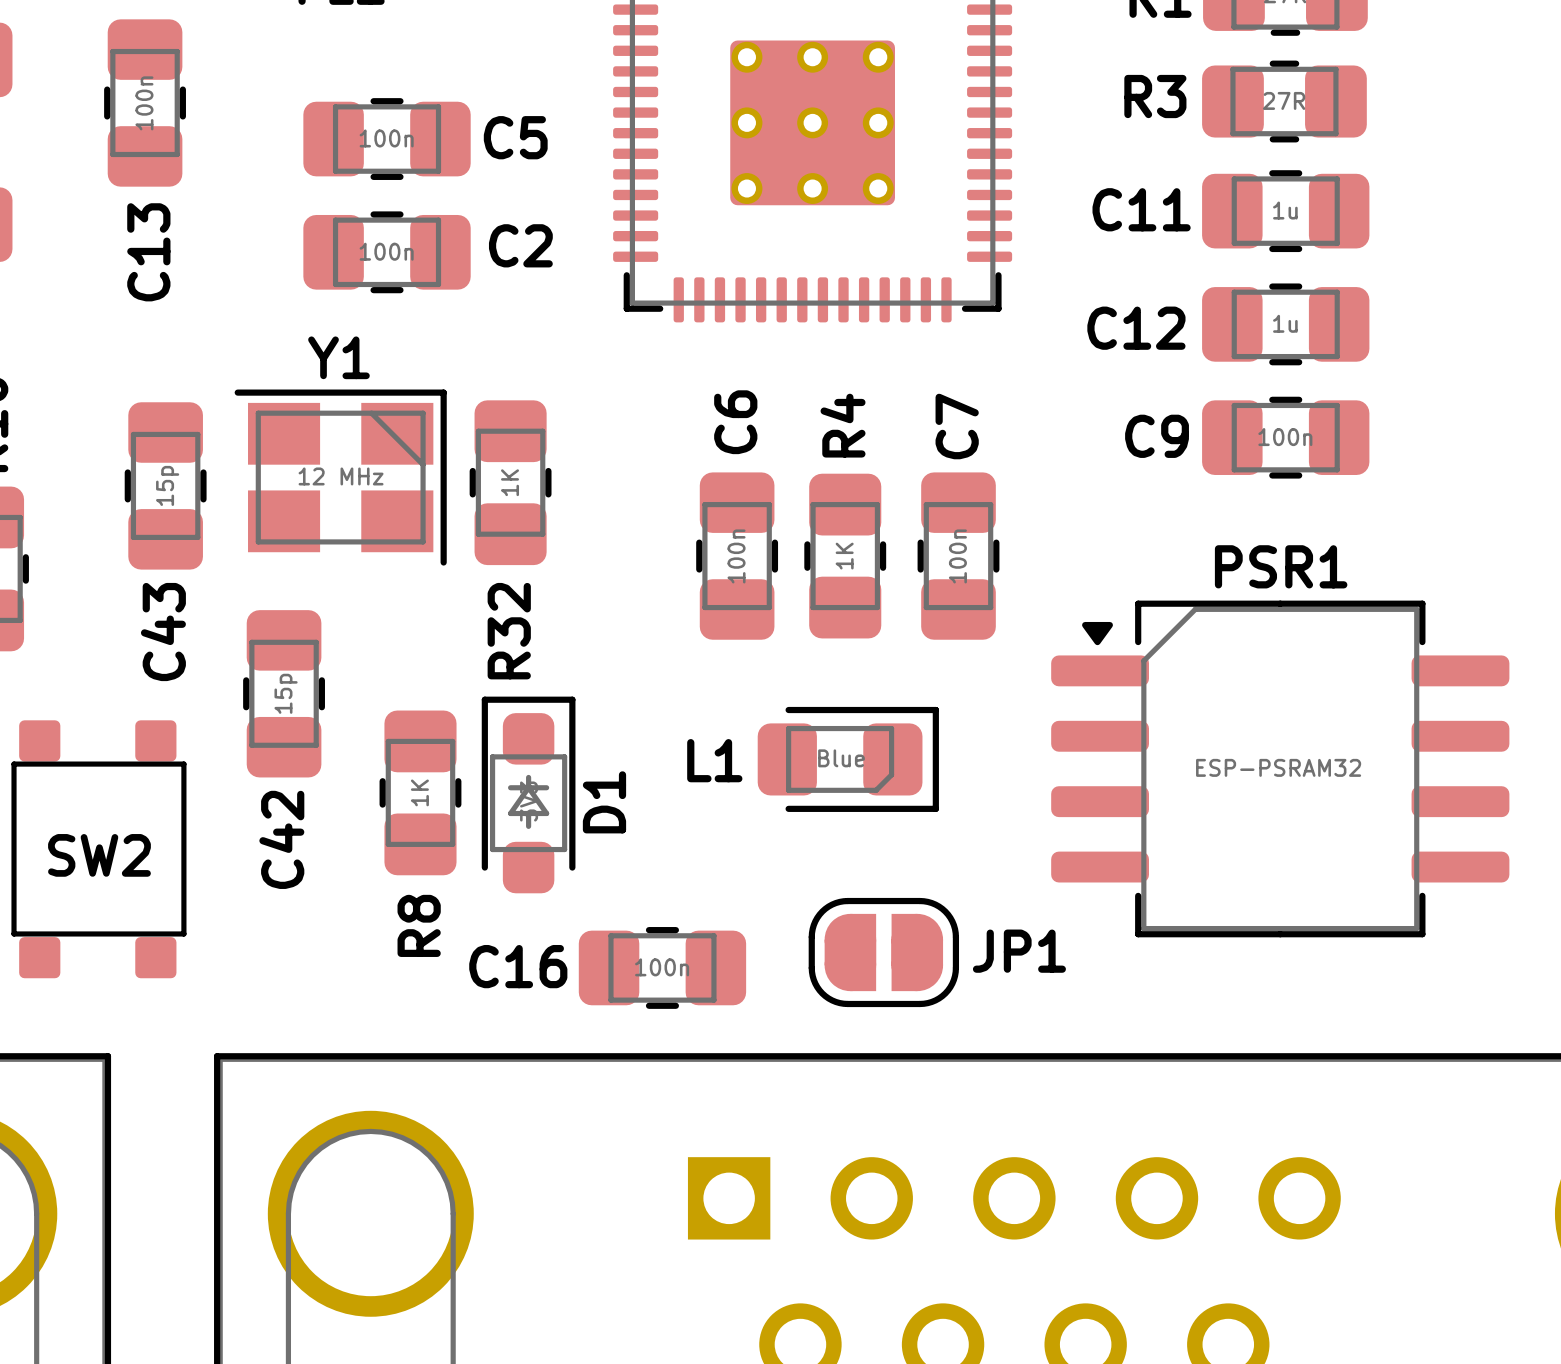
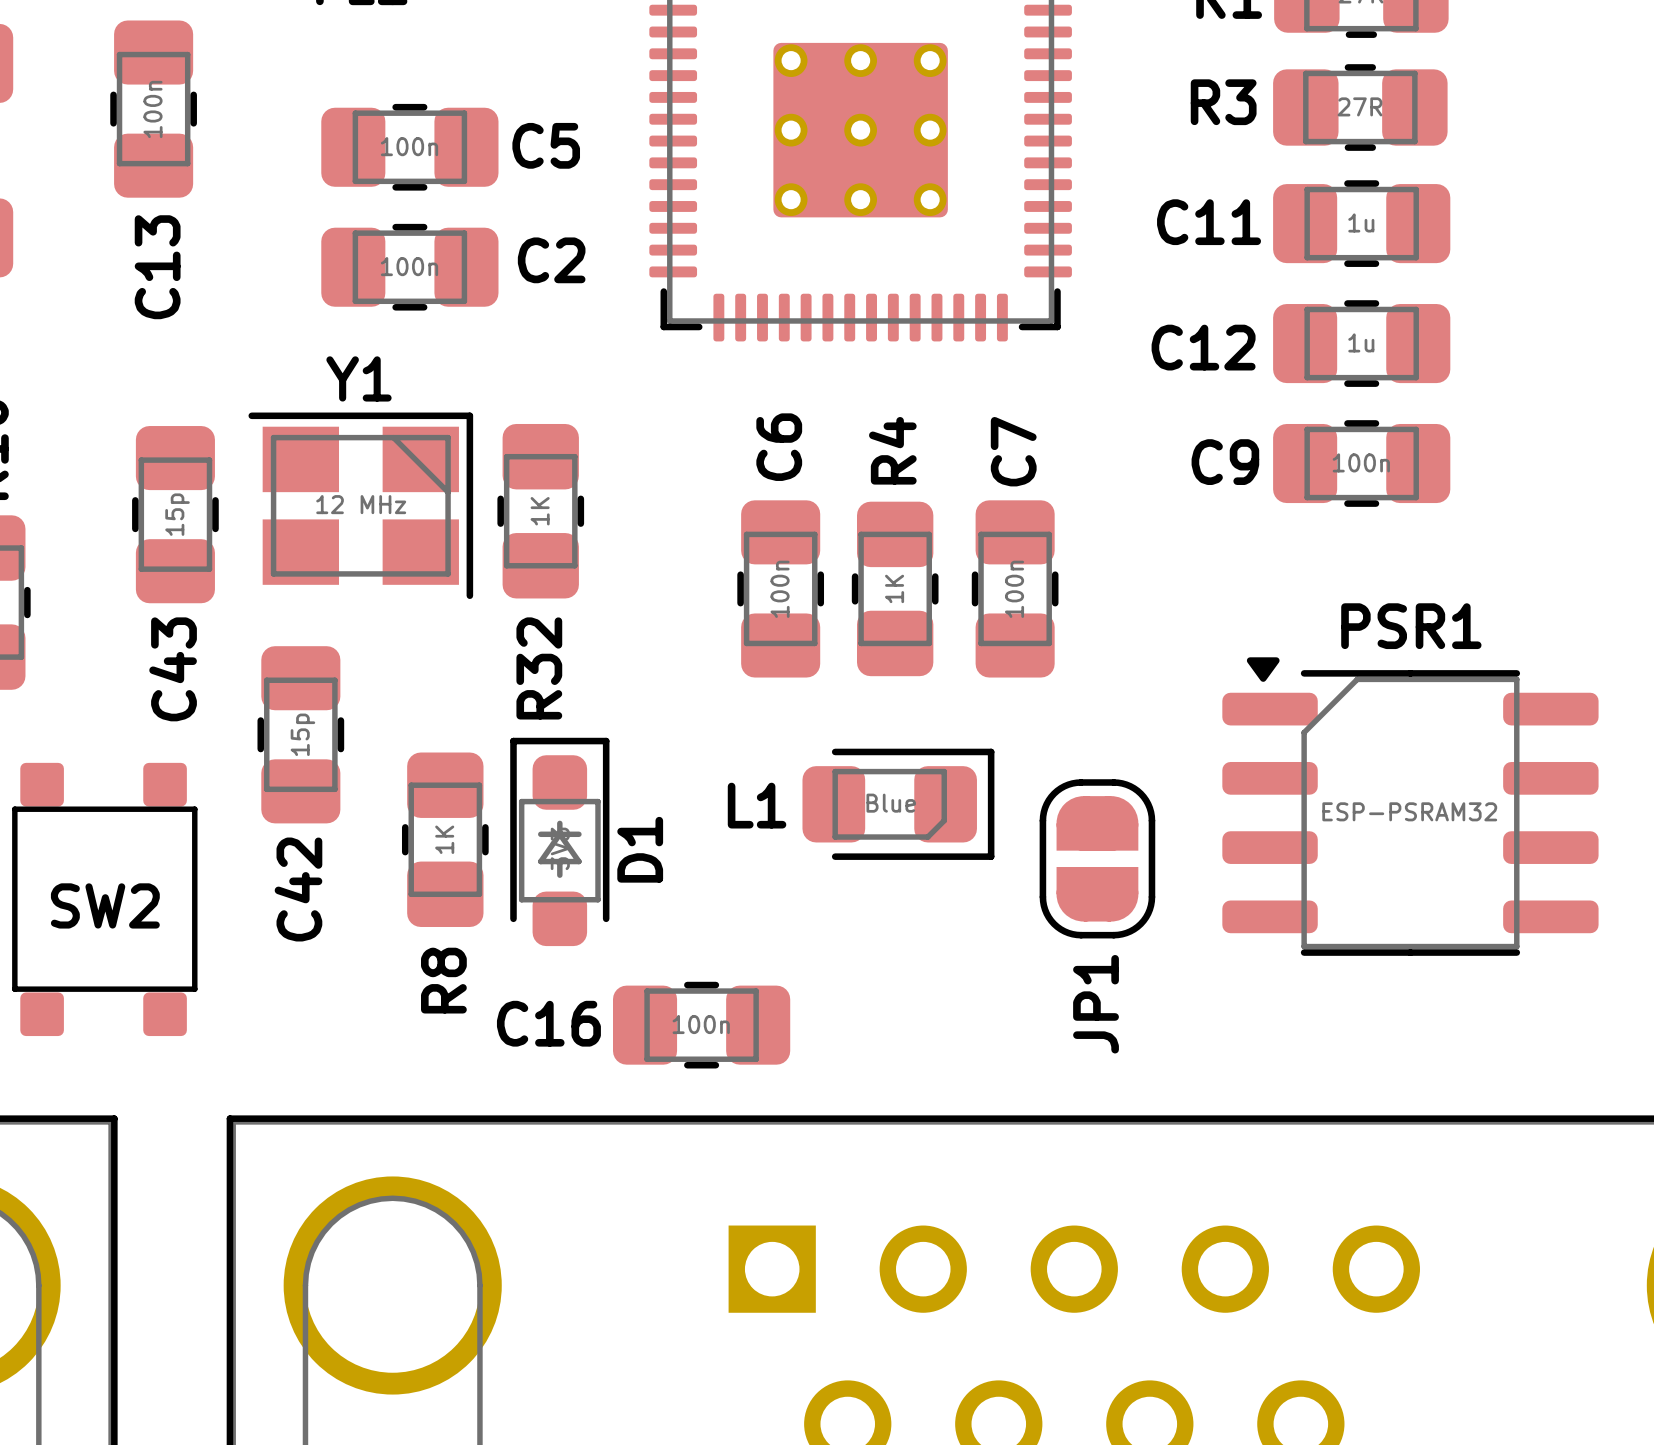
PSR1 footprint: [1051, 600, 1510, 938] -> [1222, 657, 1599, 956]
JP1 rotation: 0° (883, 952) -> 90° clockwise (1097, 858)
JP1 position: (883, 952) -> (1097, 858)

